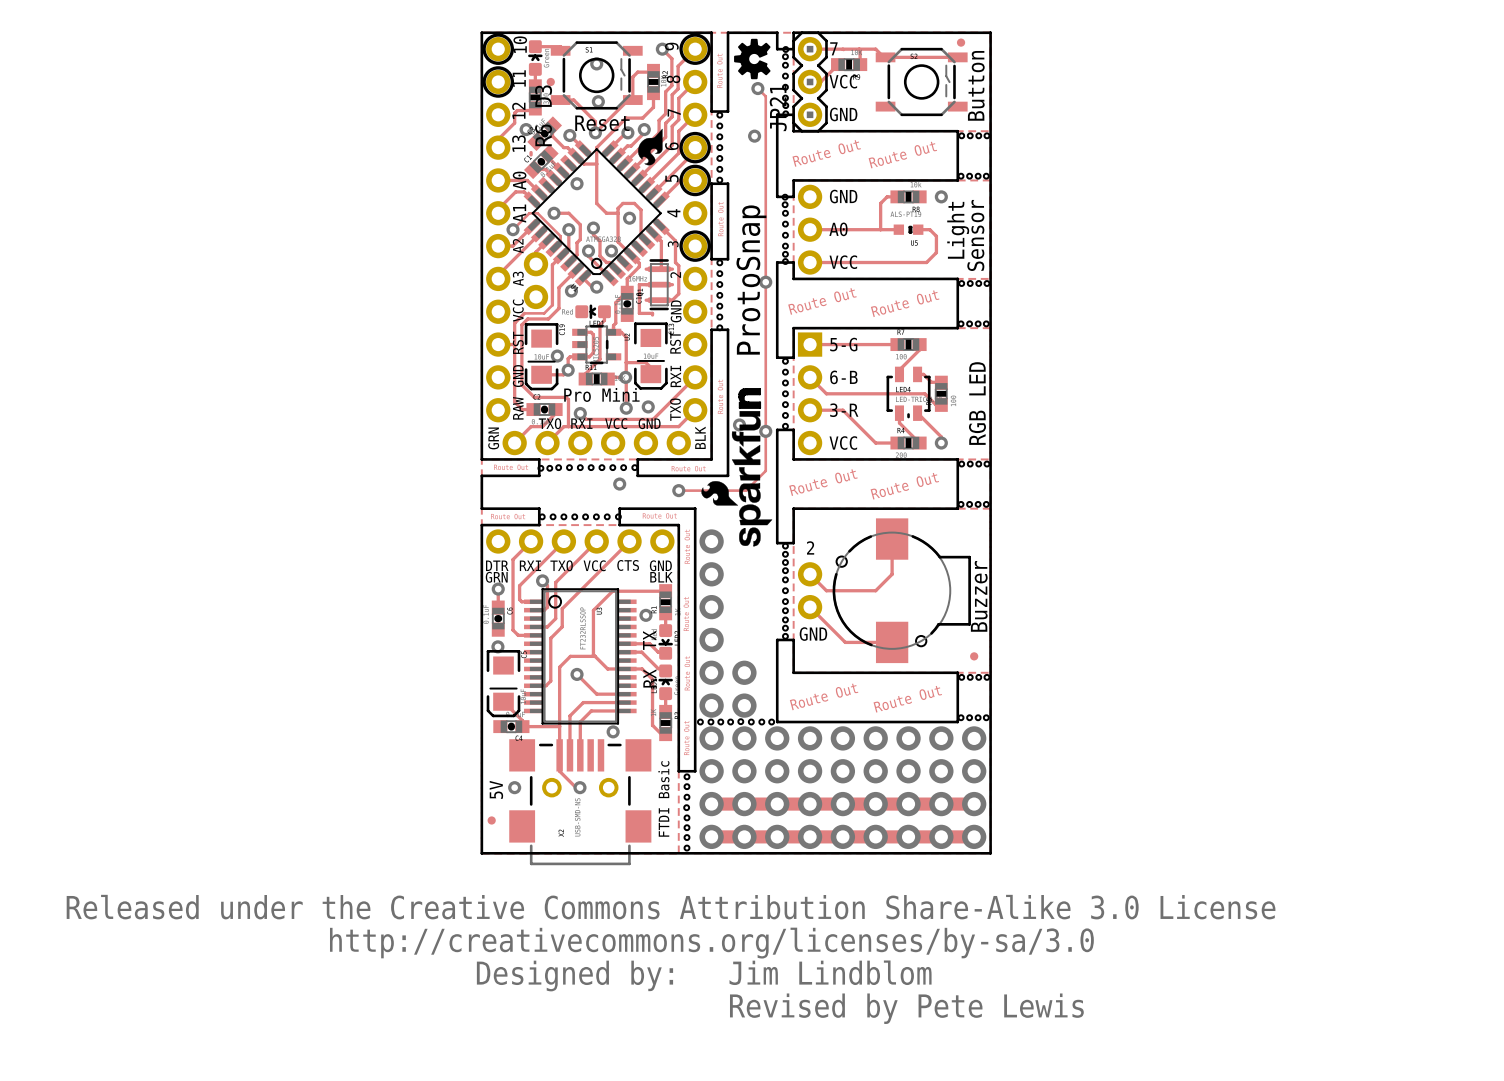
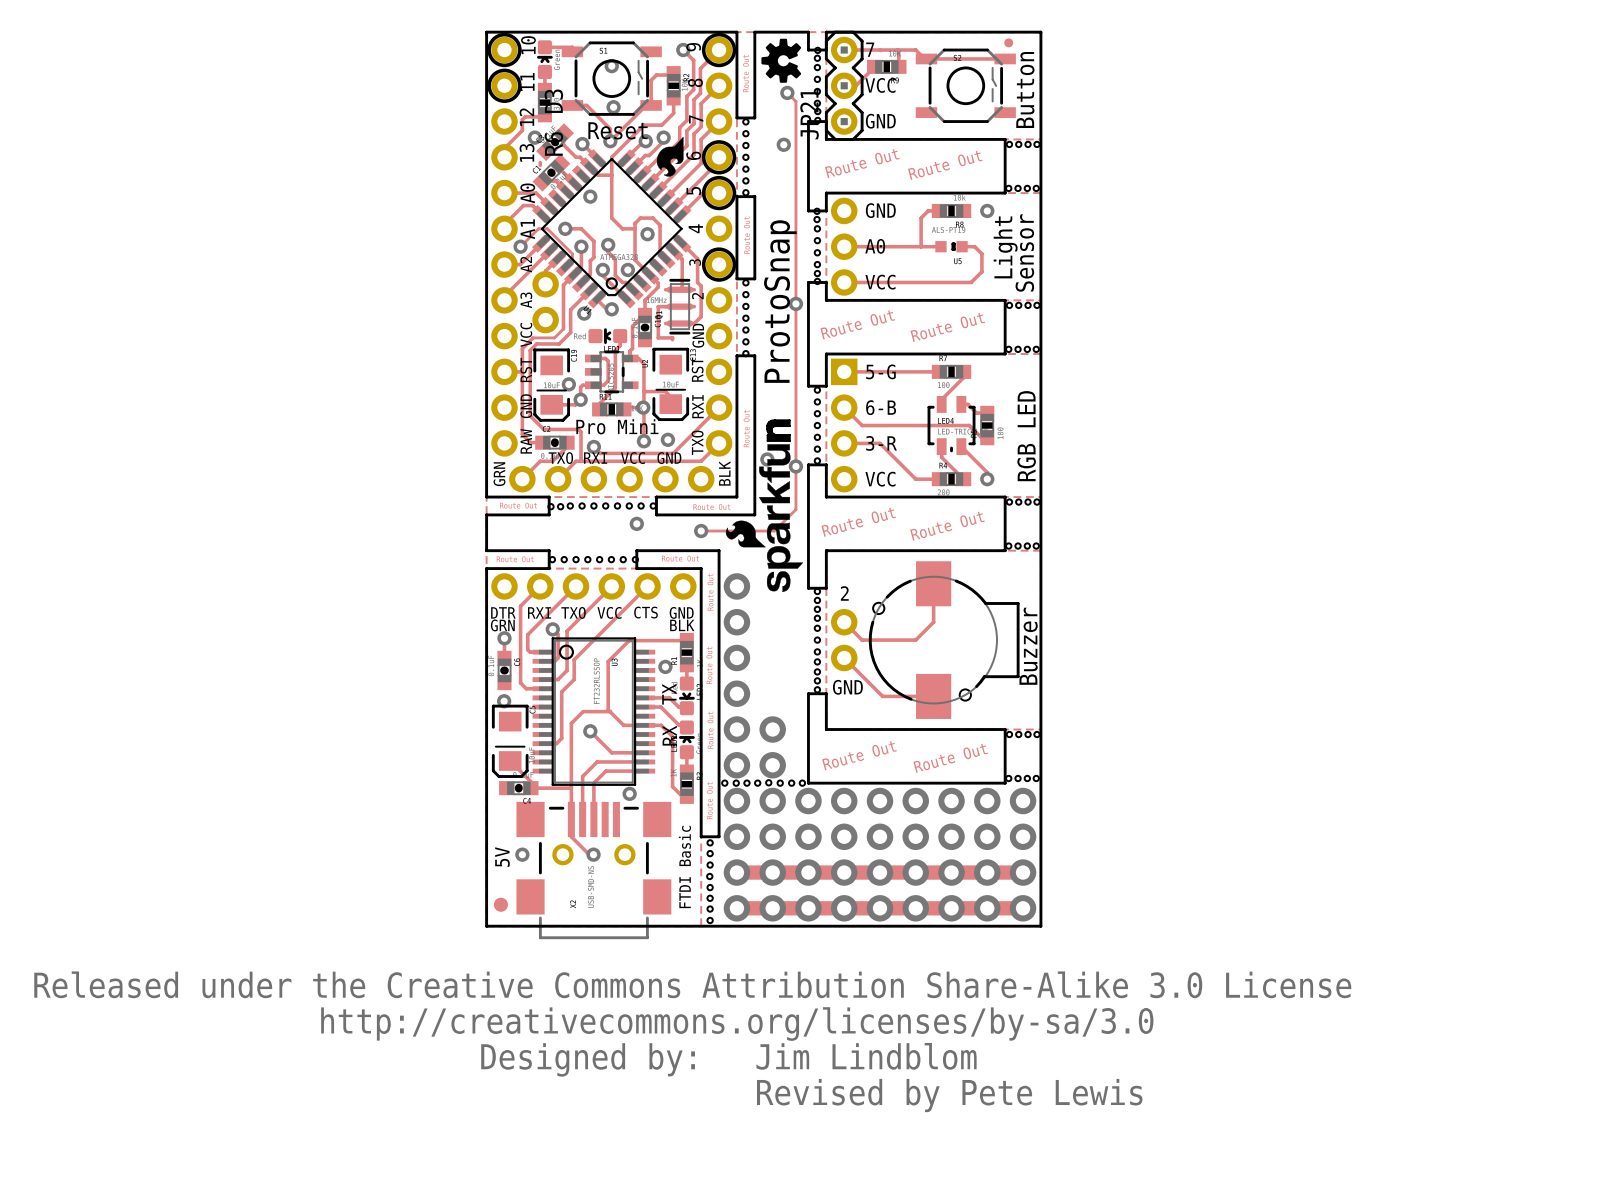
part: (550, 81) -> none
part: (974, 656) -> none
part: (491, 820) -> none
part: none -> (500, 904)

